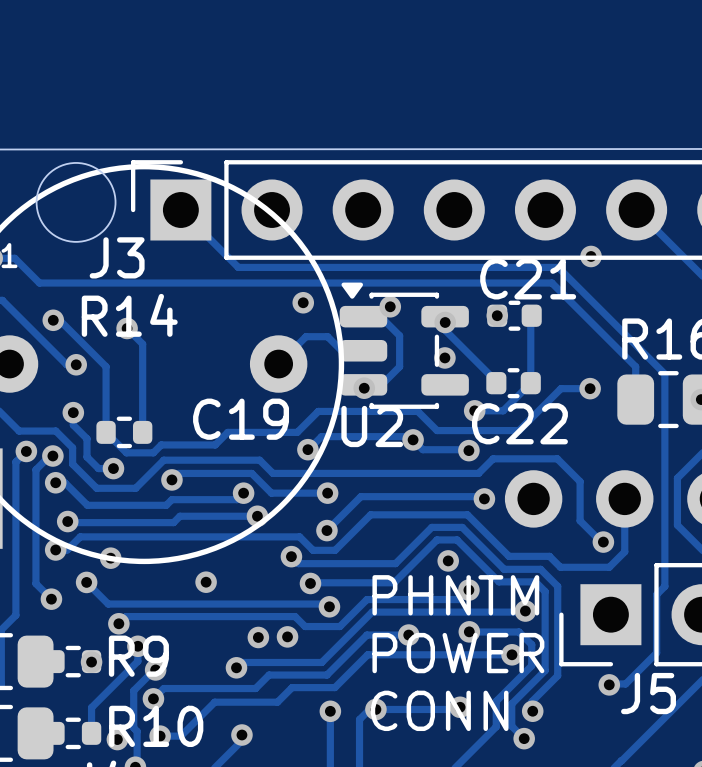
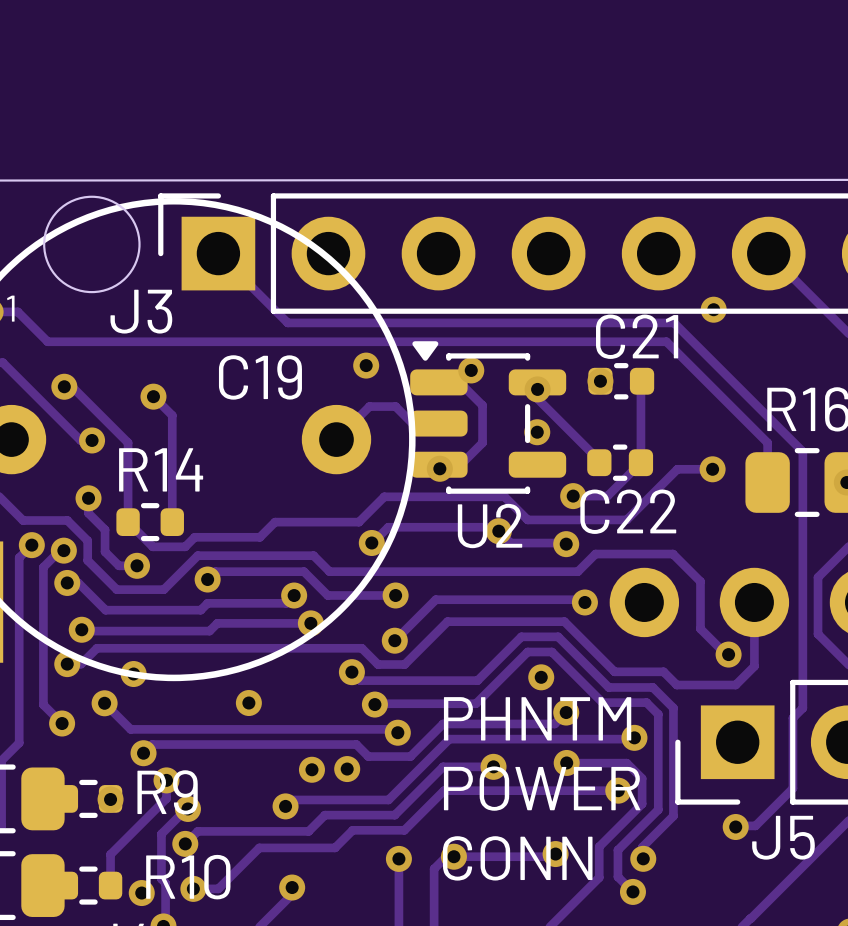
R14 name position: R14 (129, 315) -> R14 (161, 469)
C19 name position: C19 (241, 419) -> C19 (260, 377)
U2 name position: U2 (372, 426) -> U2 (490, 526)

